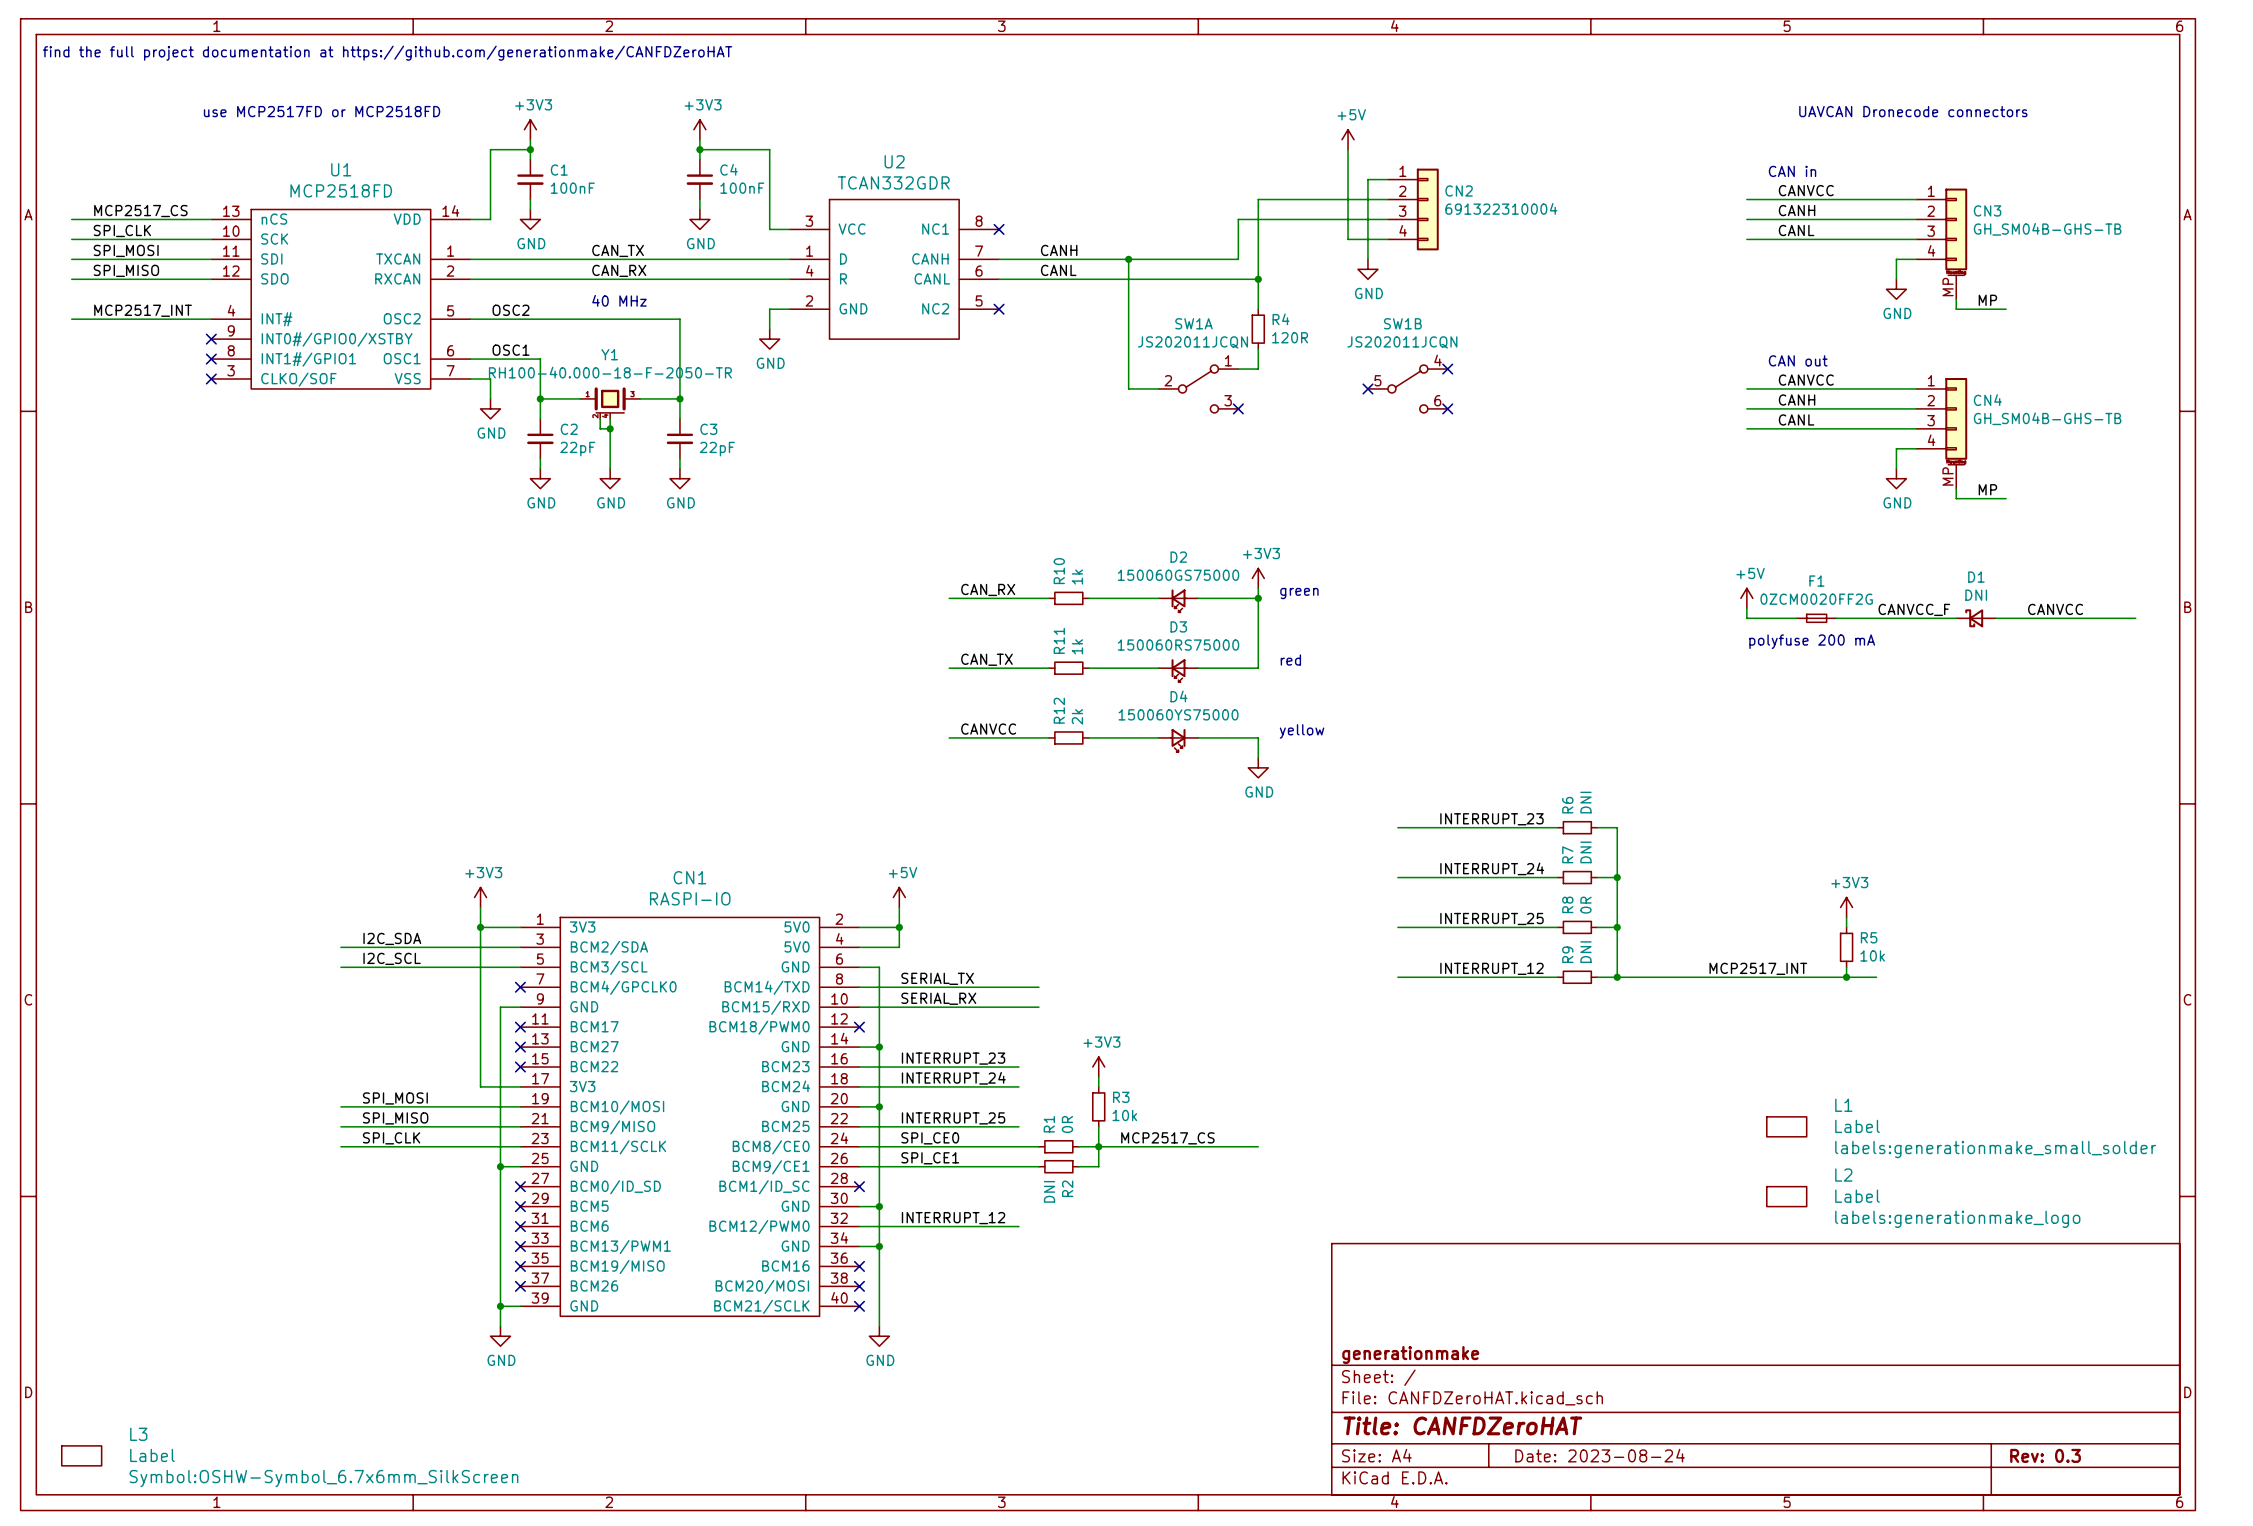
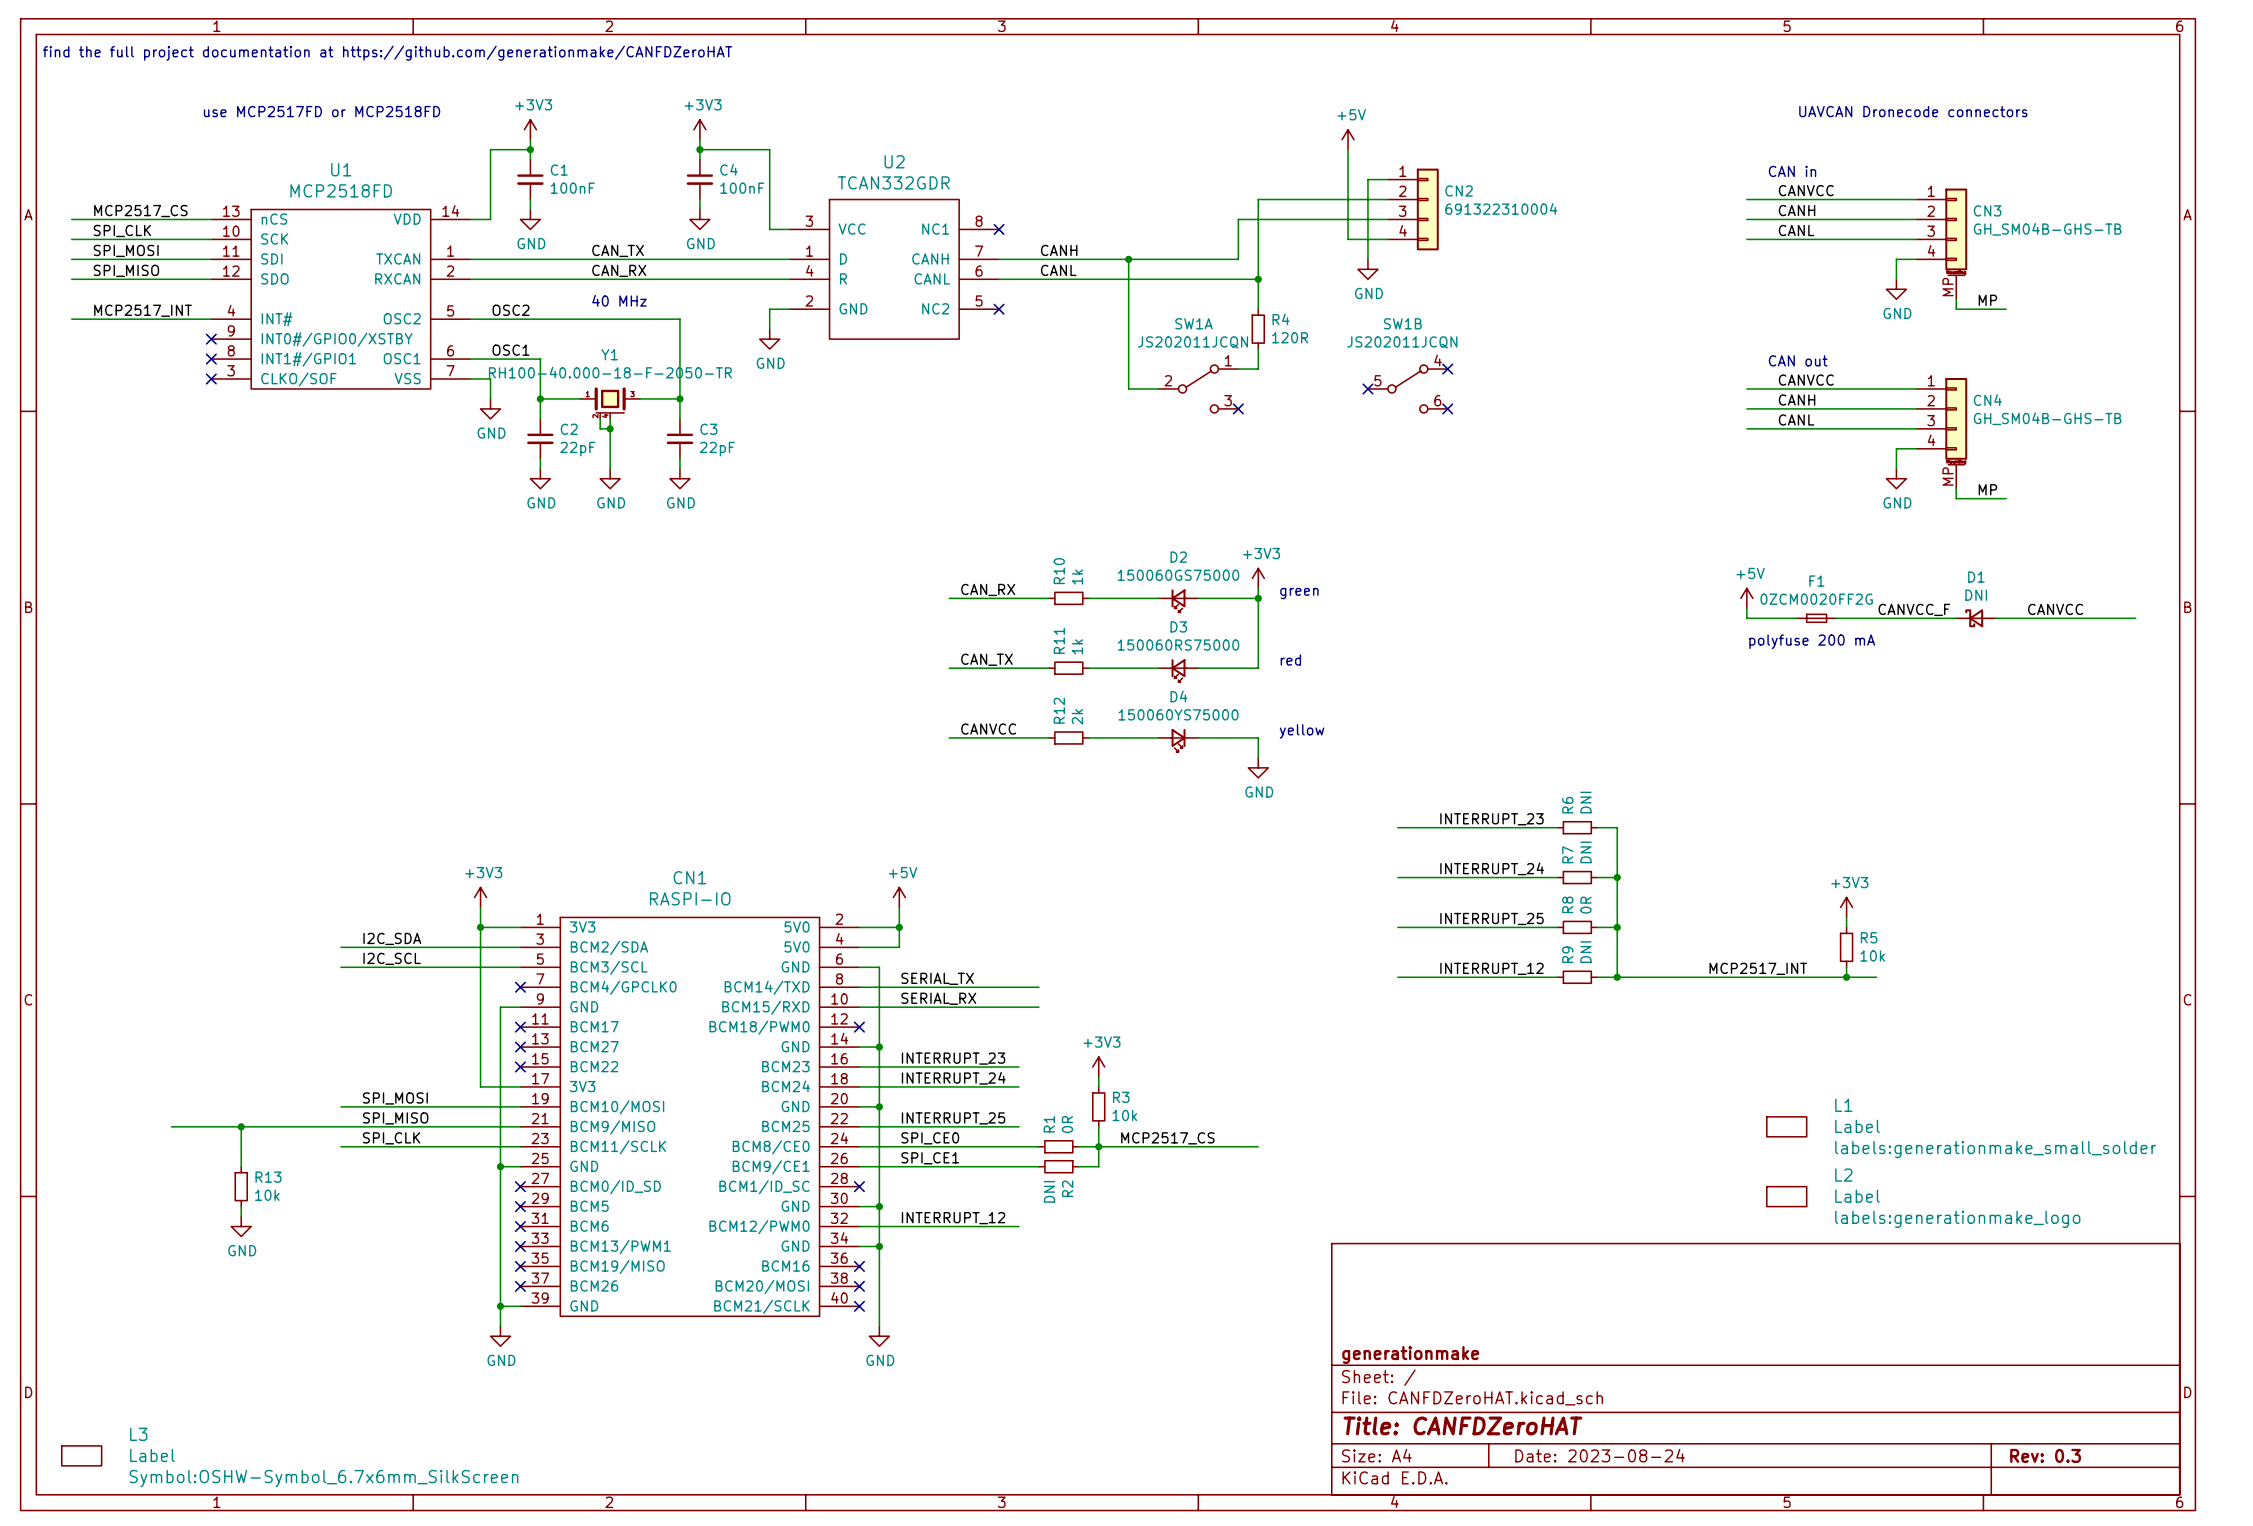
wire: none -> (171, 1126) (340, 1126)
wire: none -> (241, 1126) (241, 1166)
junction: none -> (241, 1126)
R13: none -> 10k (241, 1186)
wire: none -> (241, 1206) (241, 1216)
power symbol: none -> GND (241, 1226)

